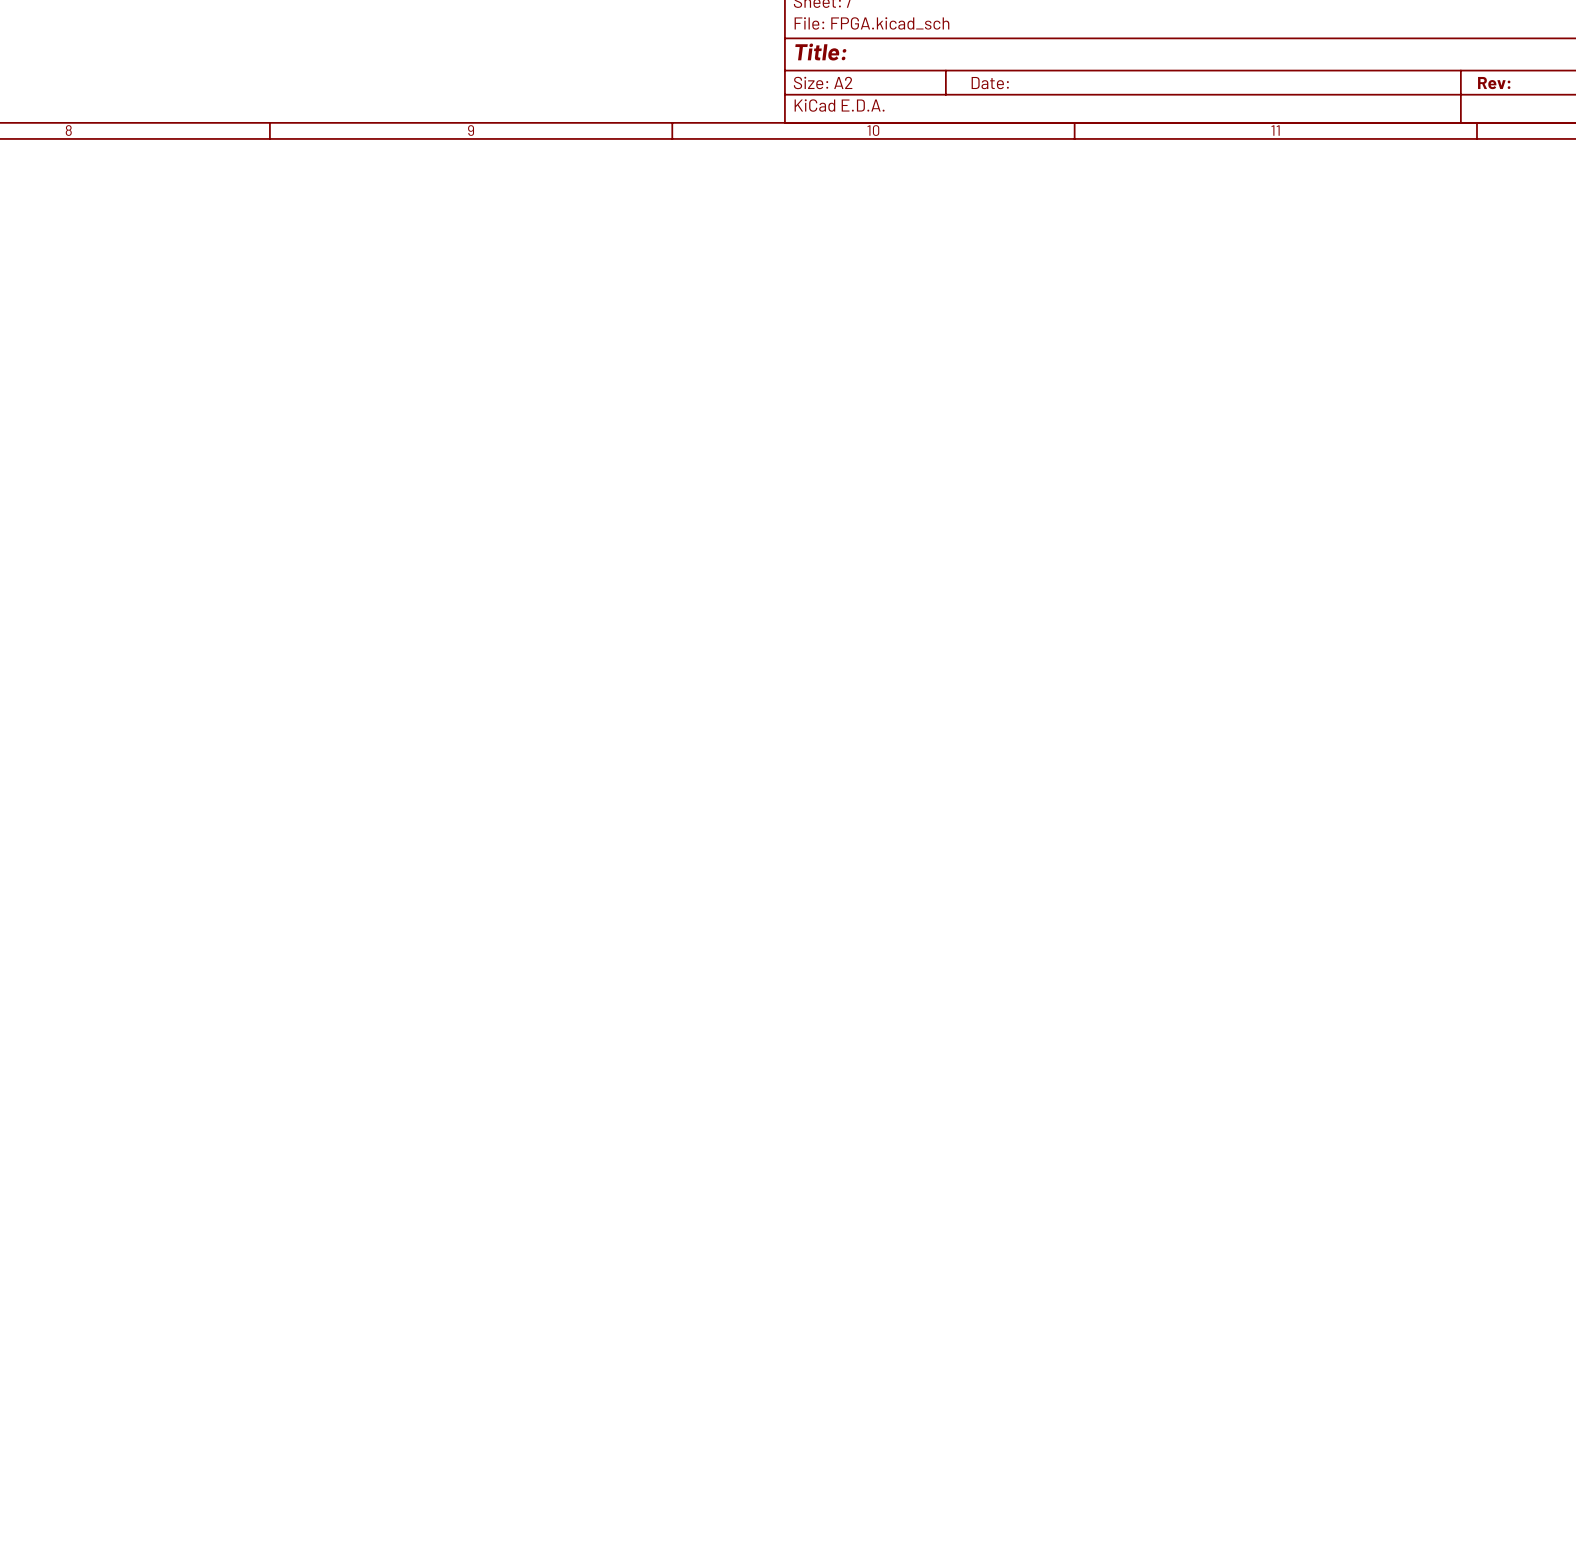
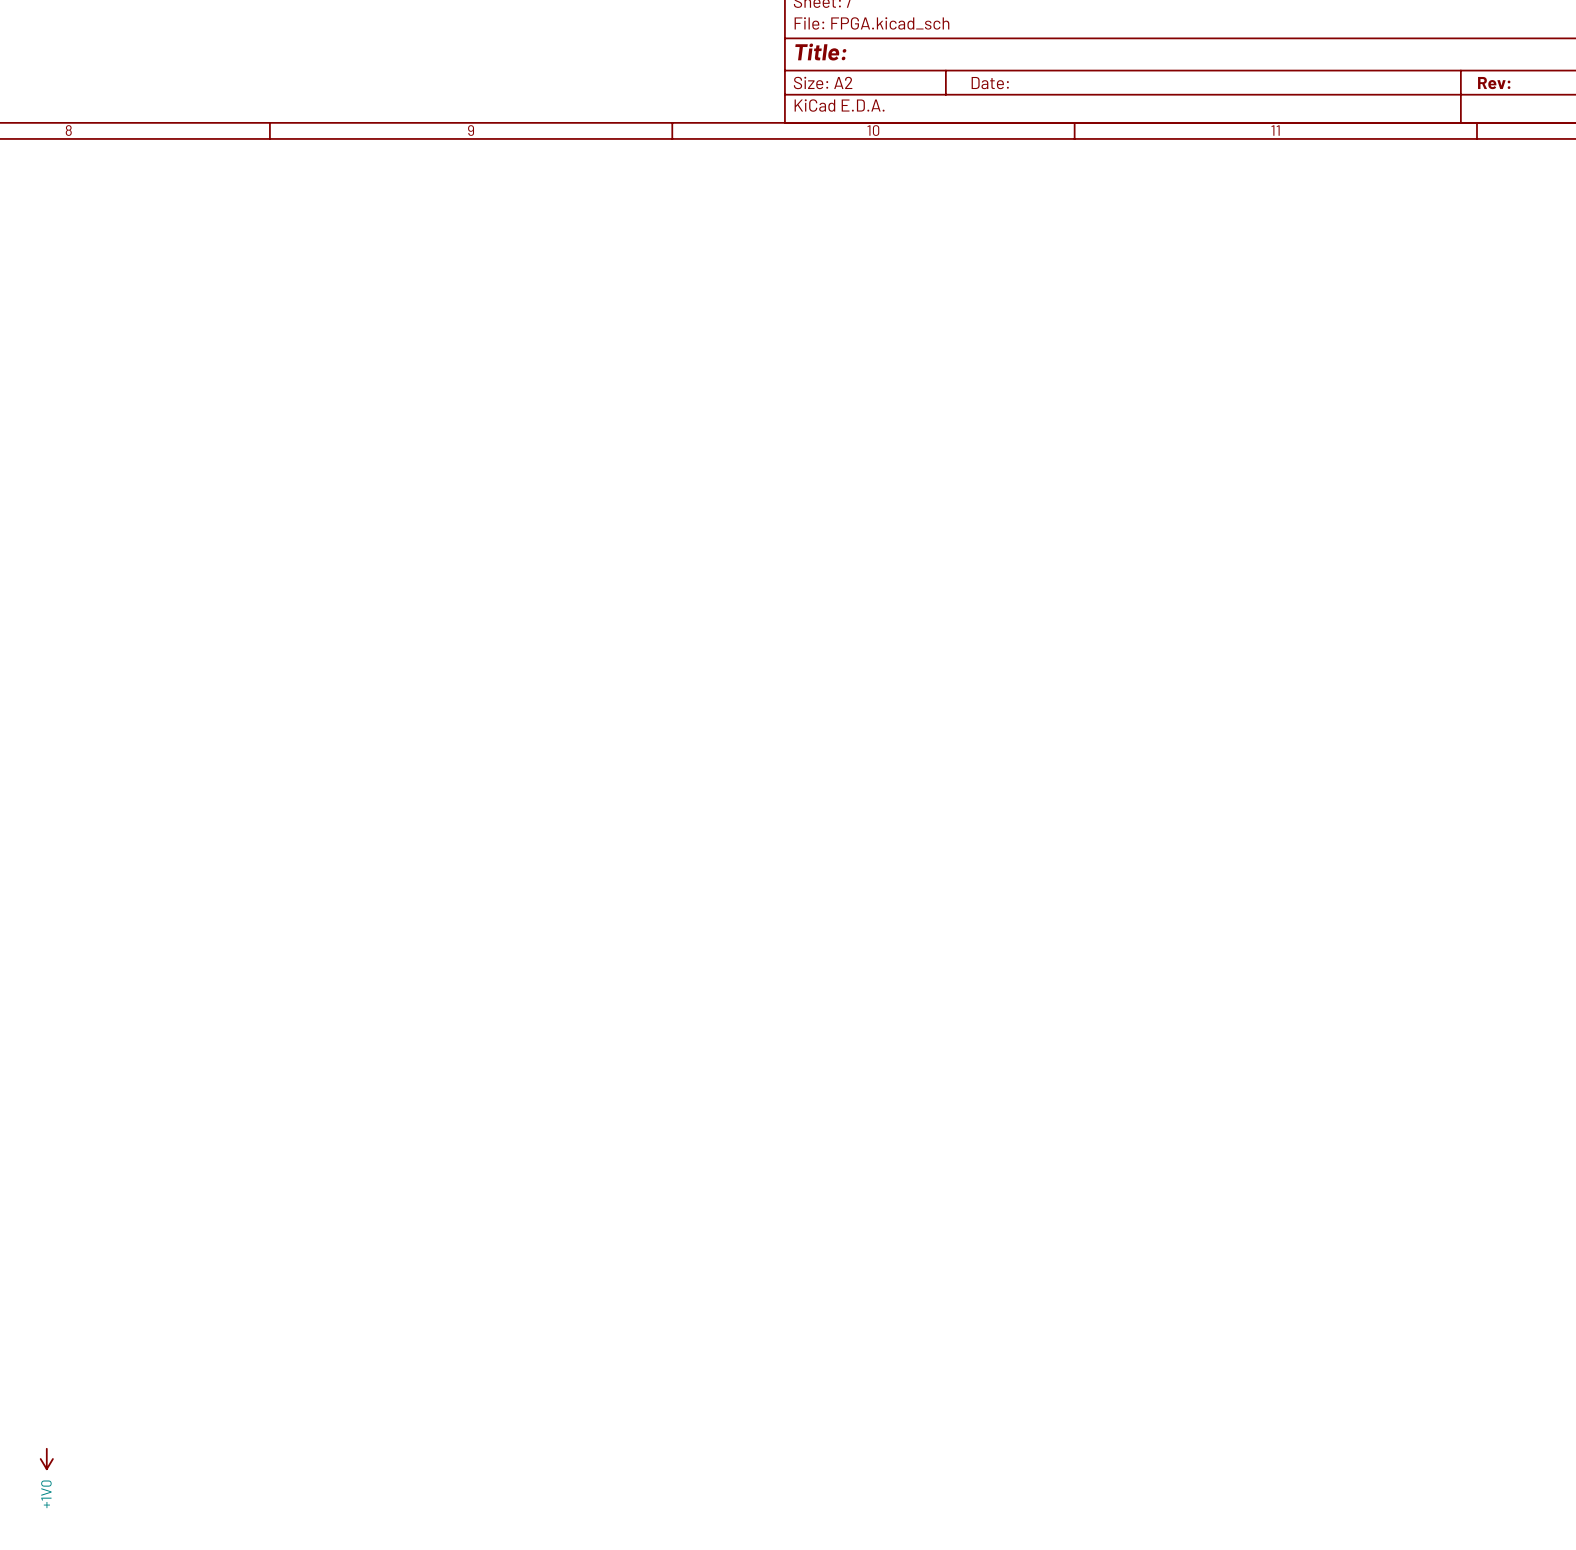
power symbol: none -> +1V0 (46, 1459)

